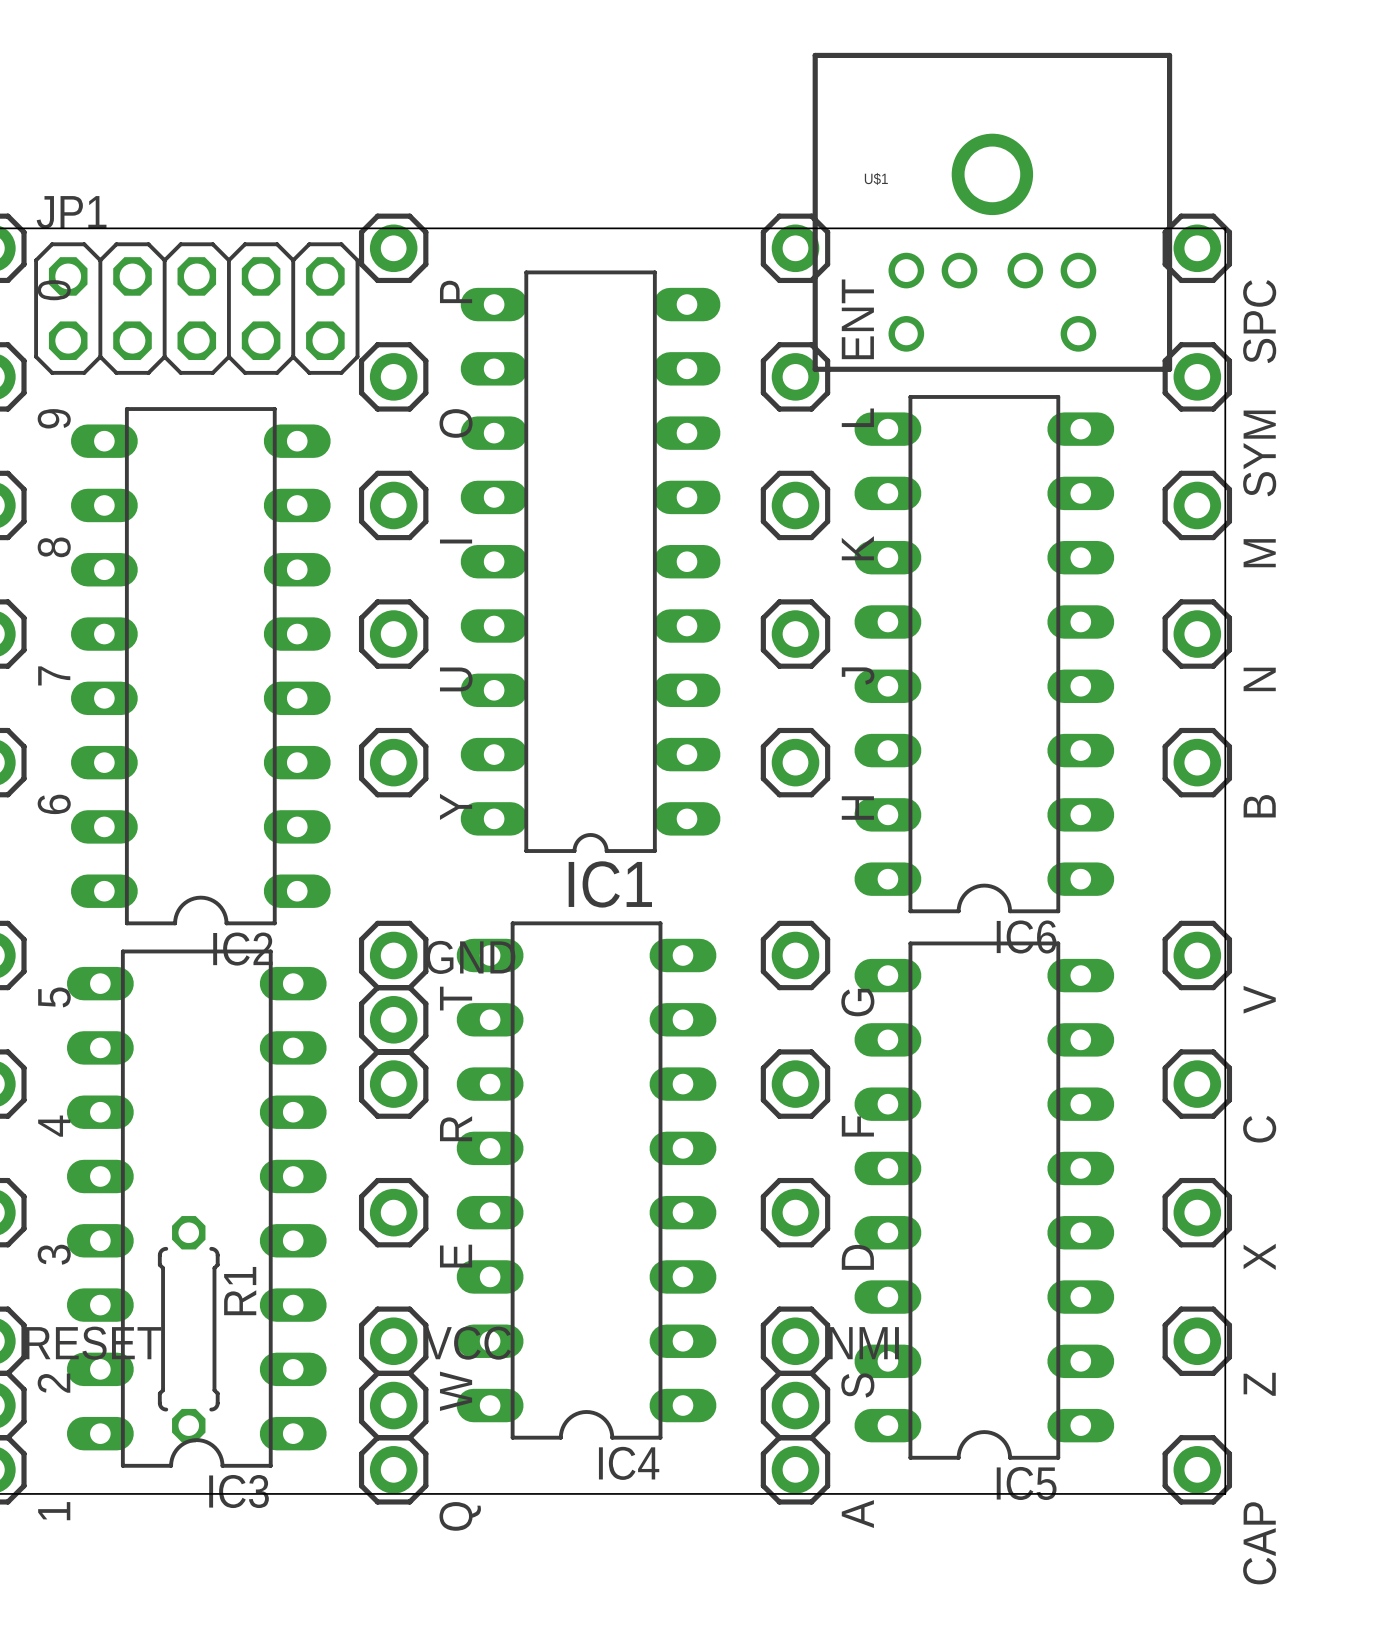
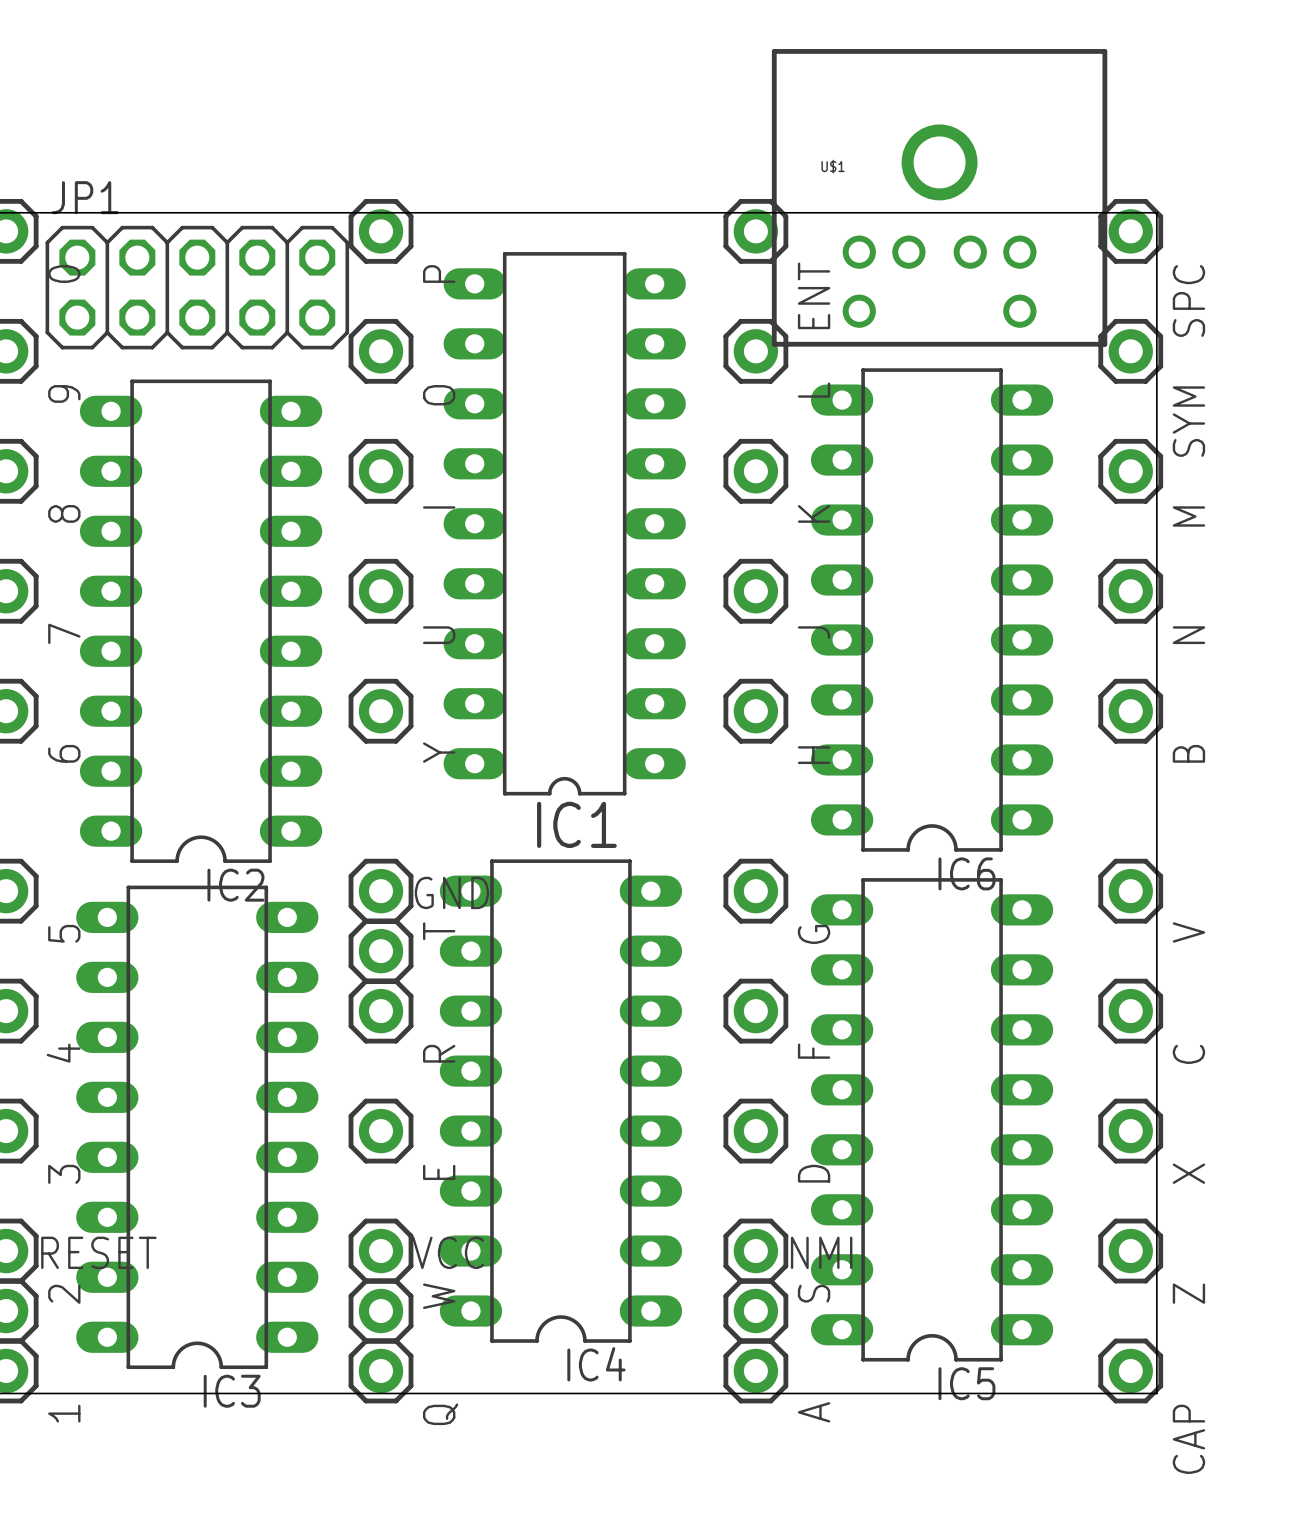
R1: (188, 1329) -> none

